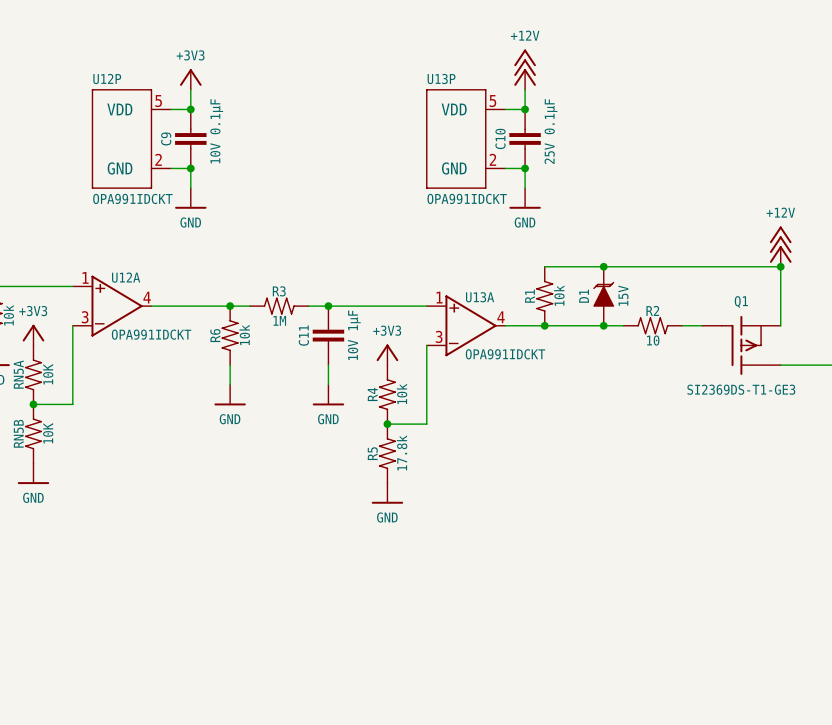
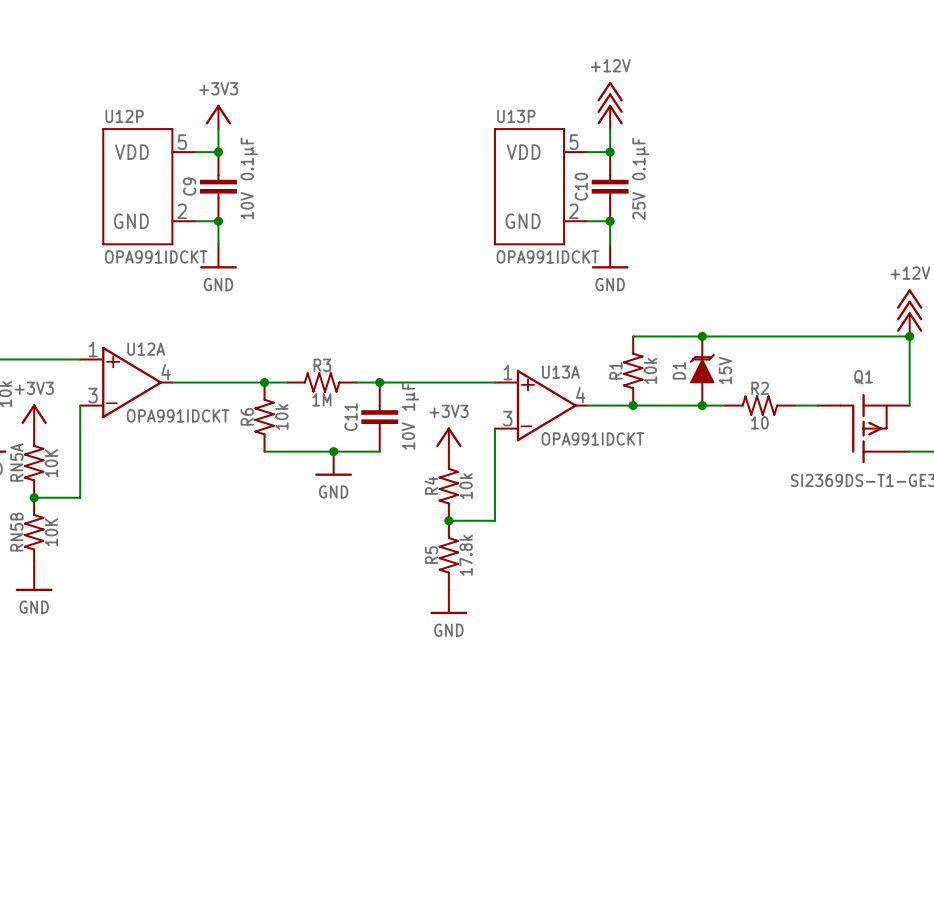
wire: (230, 365) (230, 384) -> (264, 451) (379, 451)
junction: none -> (333, 451)
wire: (328, 365) (328, 384) -> none
power symbol: none -> GND (333, 463)
power symbol: GND (230, 395) -> none
power symbol: GND (328, 395) -> none

